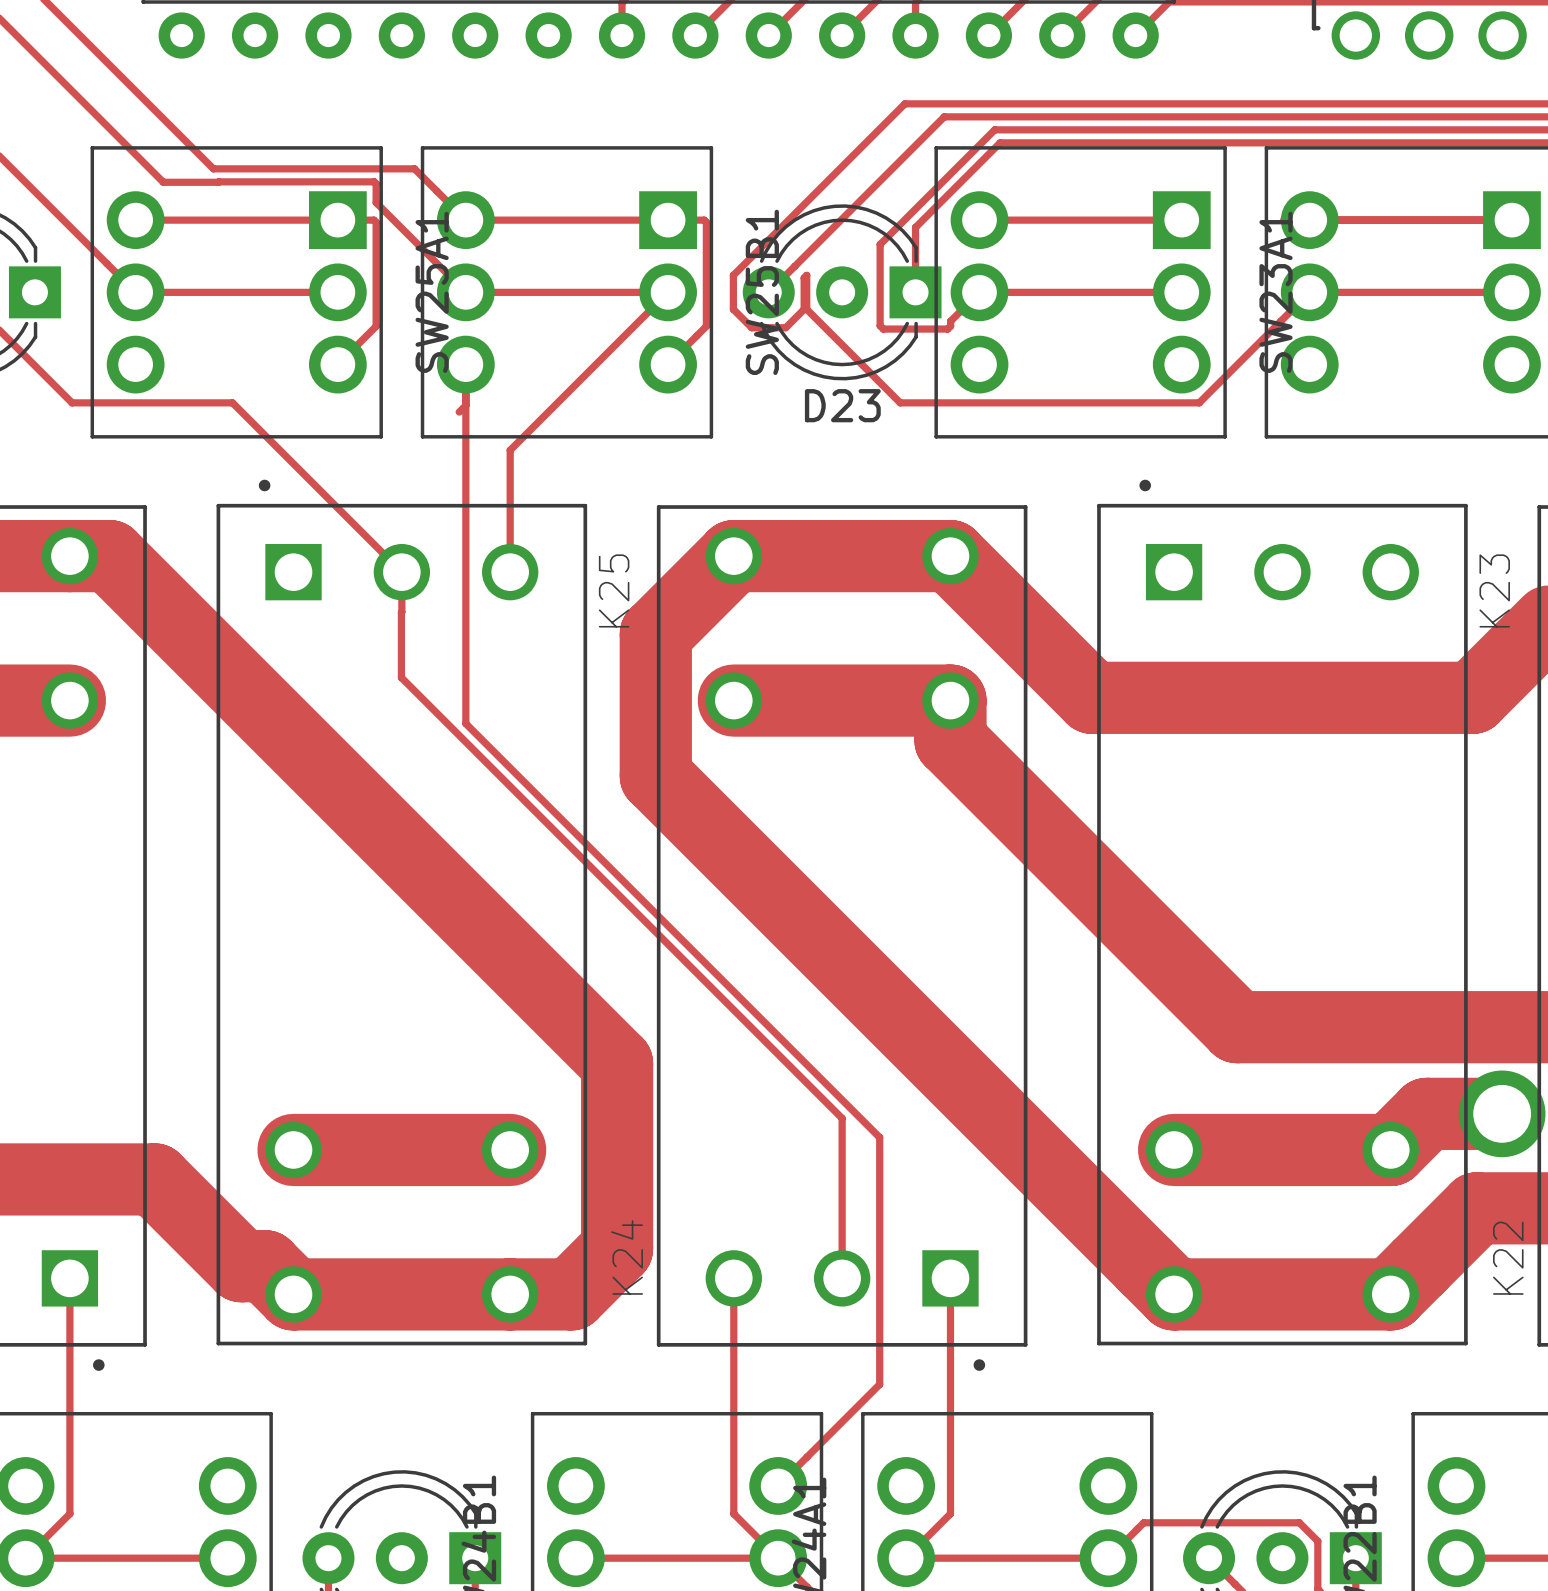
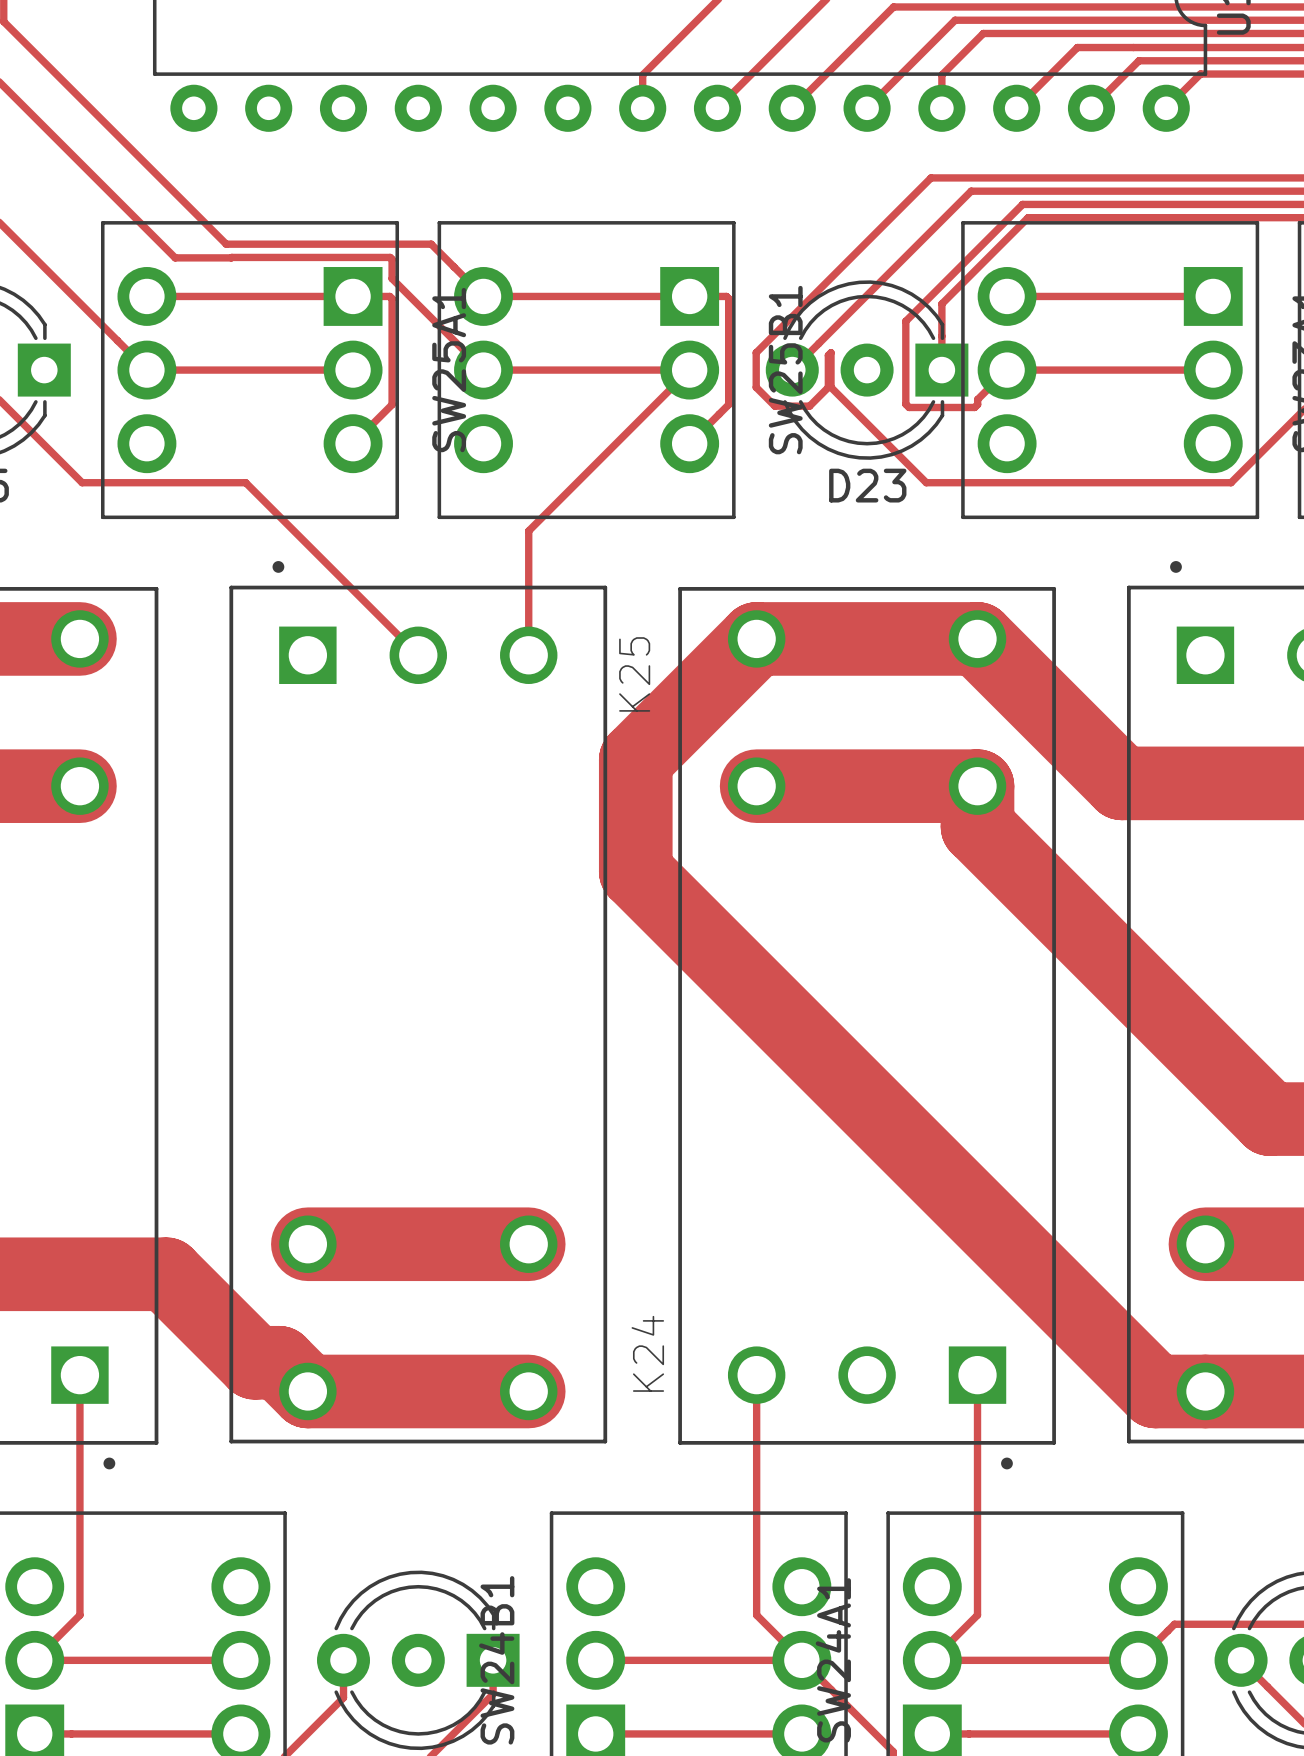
track: (465, 364) (465, 723) (879, 1137) (879, 1384) (778, 1485) -> none
track: (465, 405) (459, 412) -> none
track: (69, 556) (109, 556) (617, 1063) (617, 1248) (571, 1294) (510, 1294) -> none
track: (401, 572) (401, 677) (842, 1118) (842, 1278) -> none
track: (655, 634) (655, 776) (1174, 1294) -> (677, 718) (635, 759) (635, 871) (1155, 1391) (1205, 1391)

